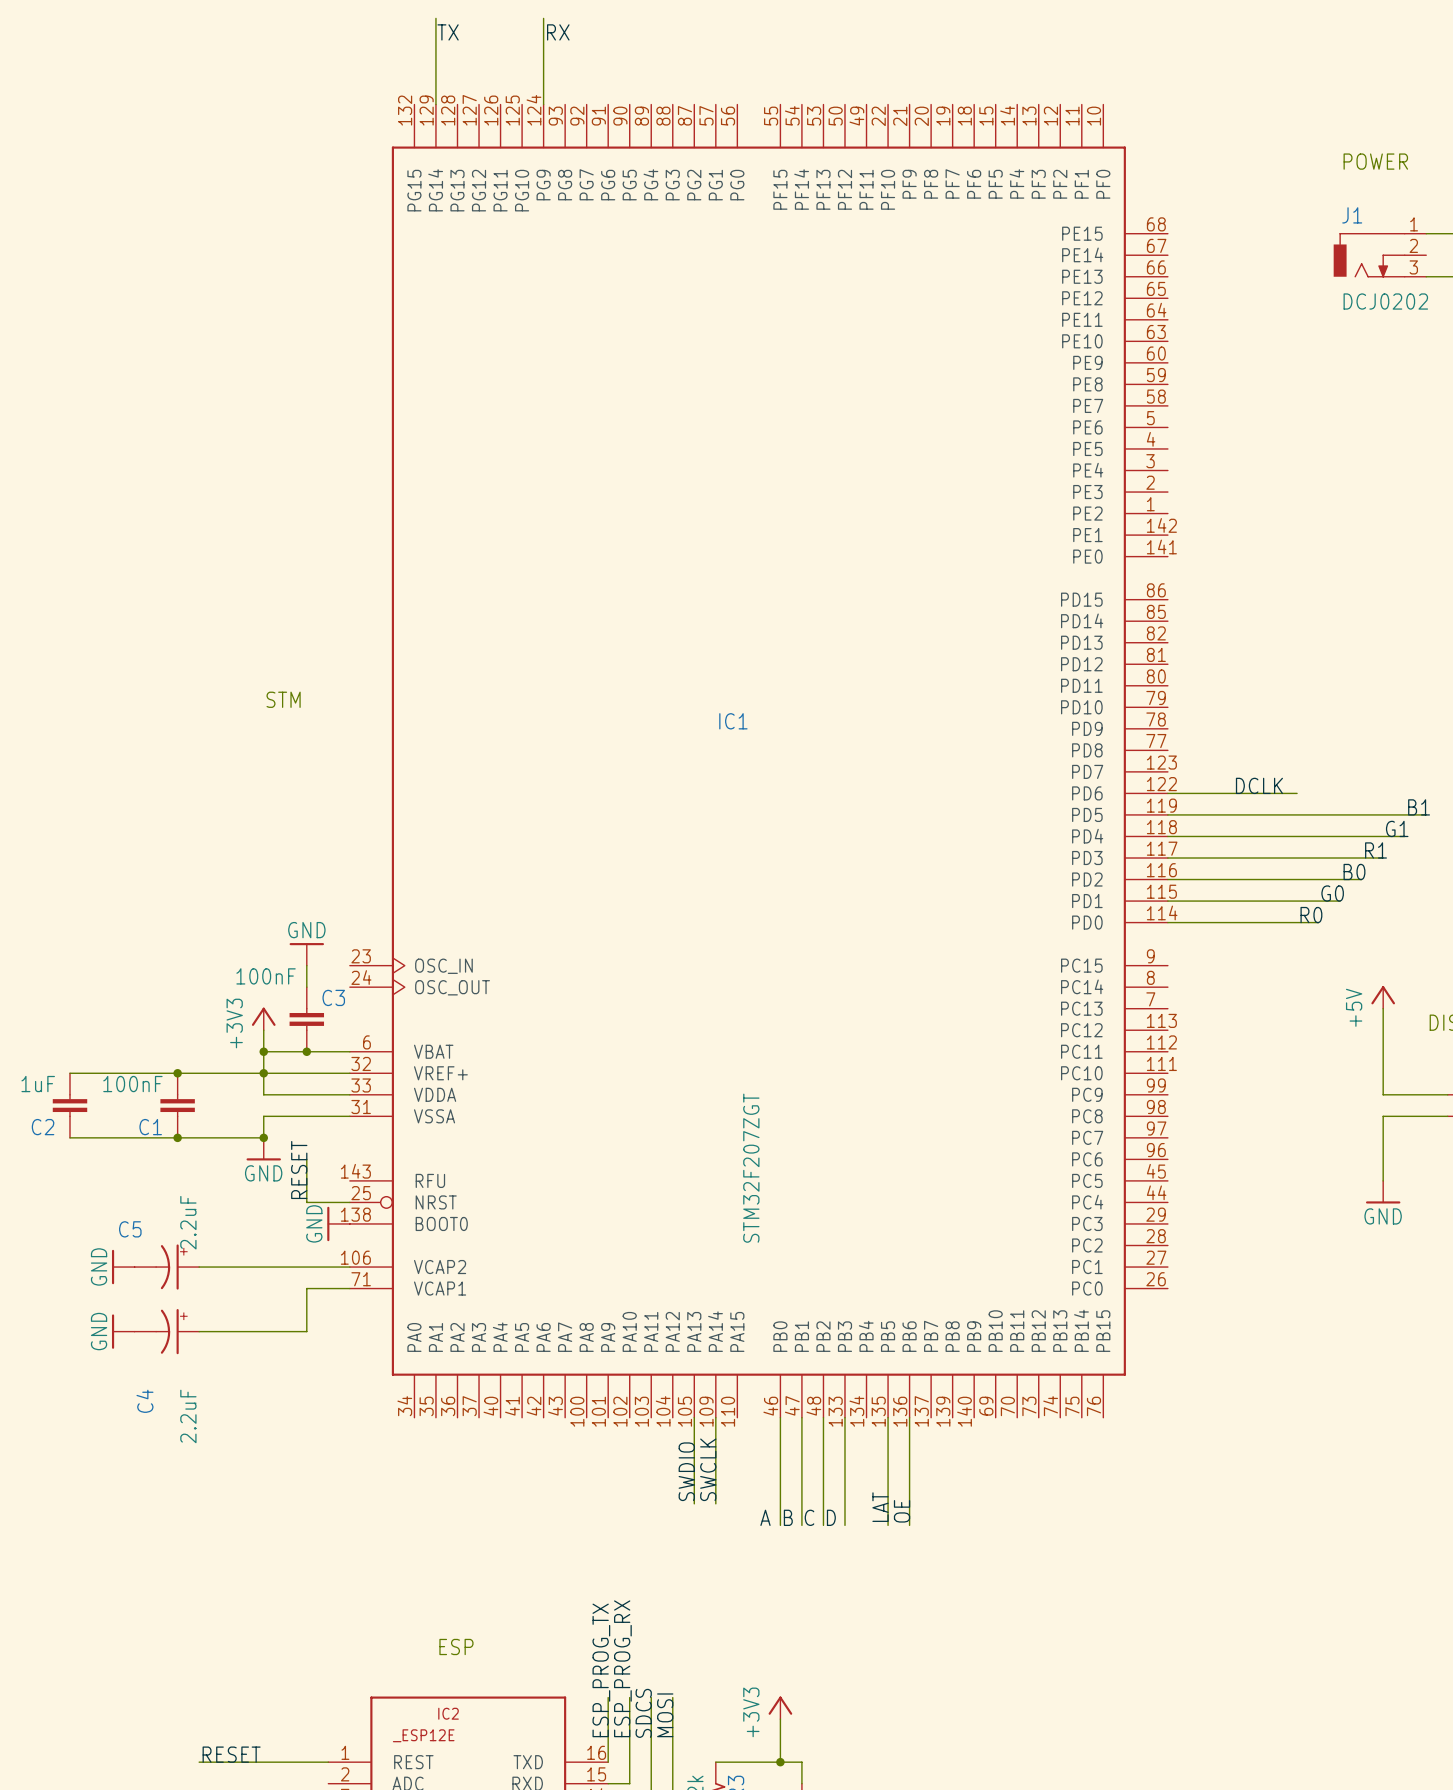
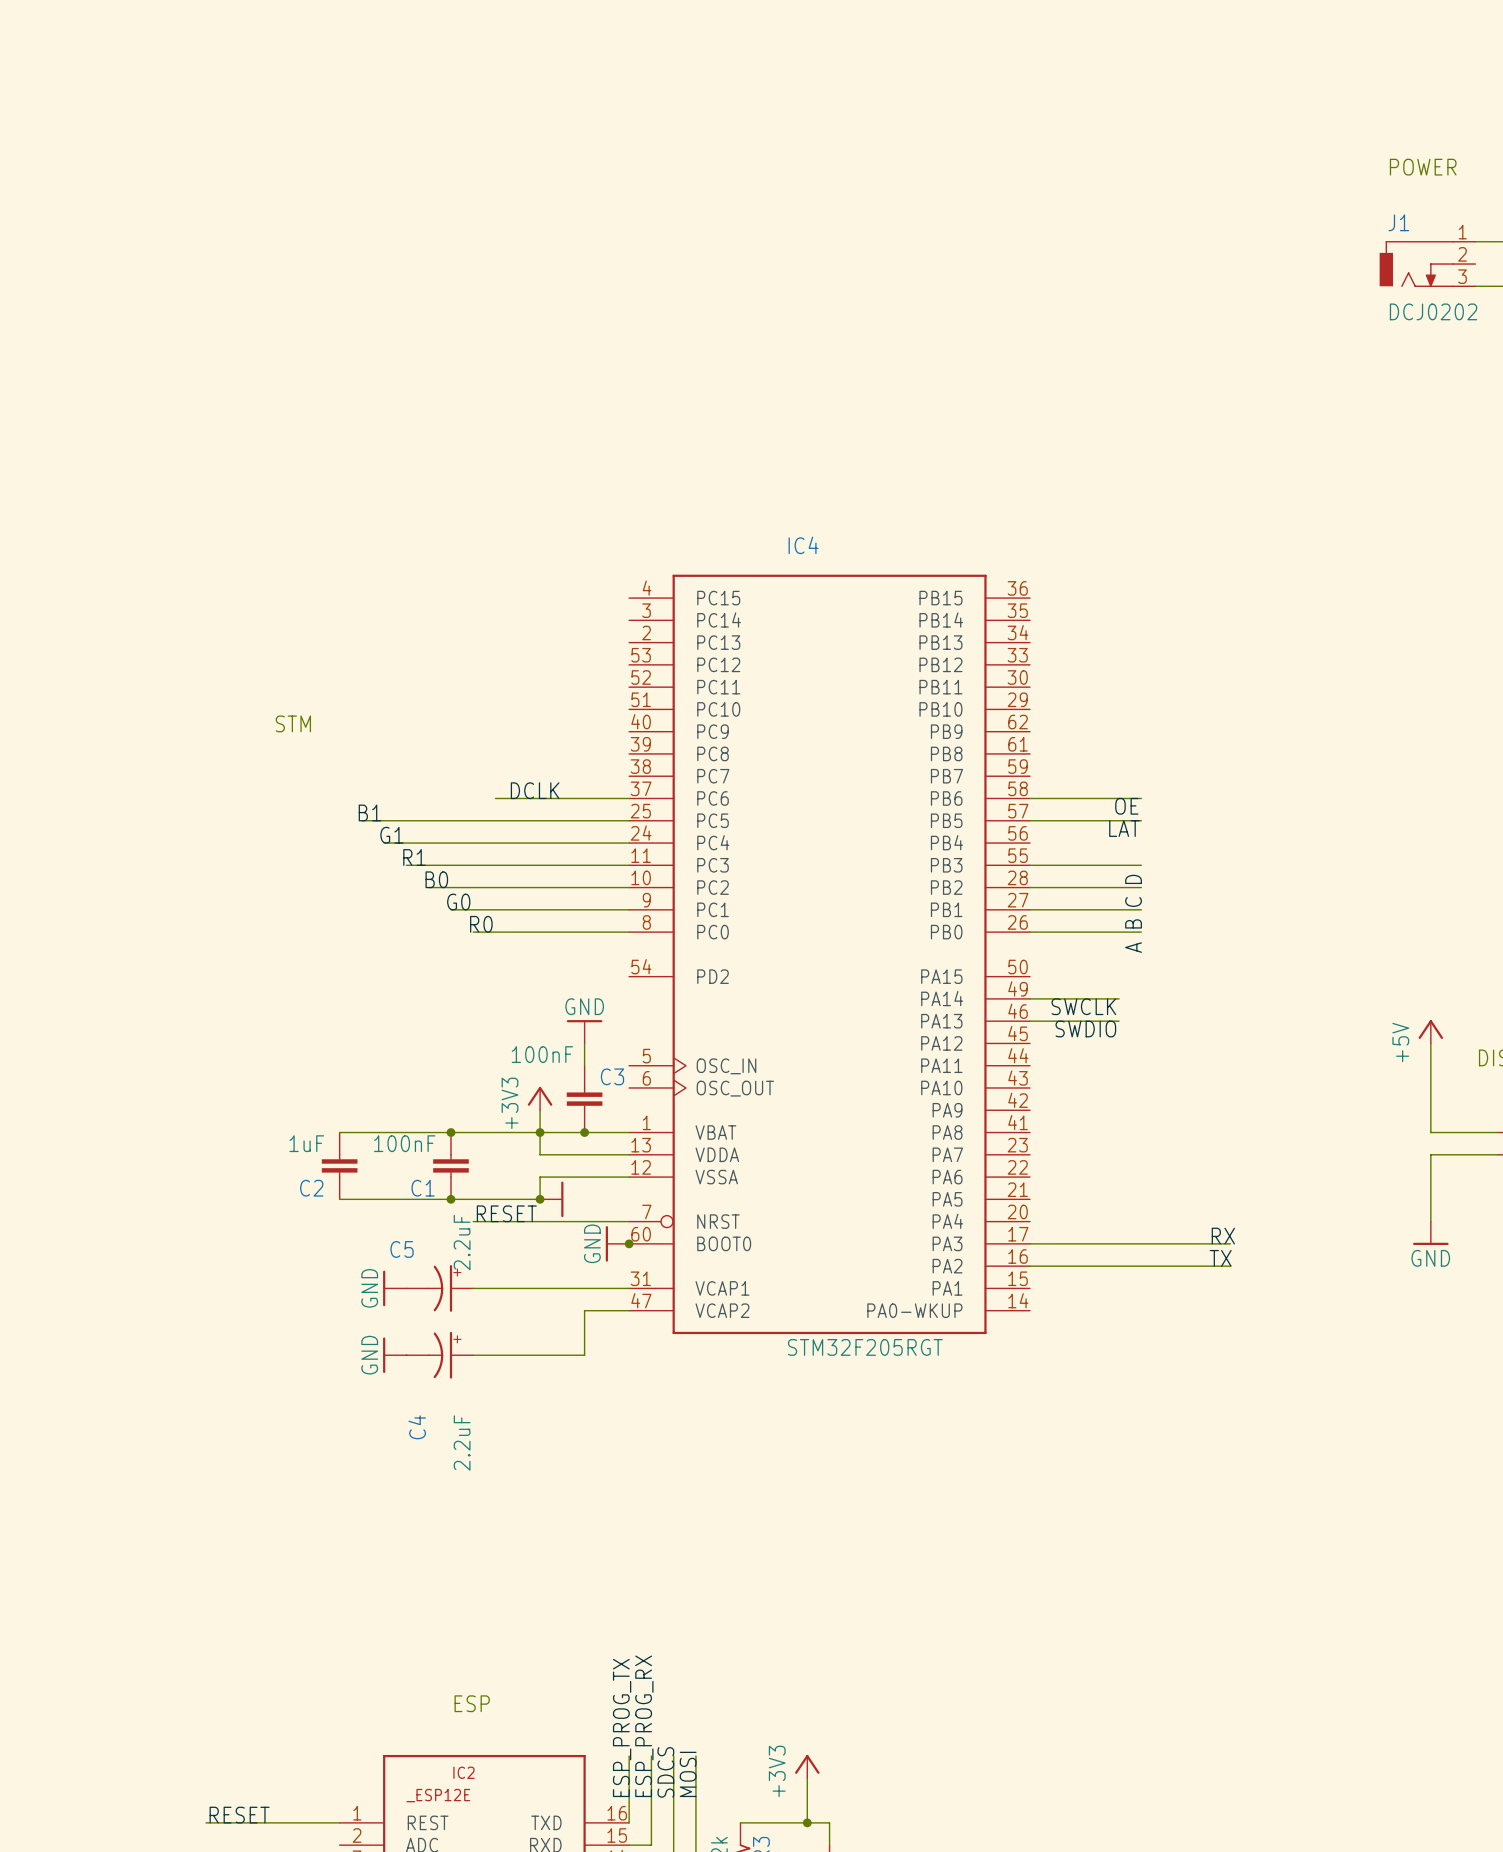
wire: (435, 18) (435, 104) -> none
wire: (543, 18) (543, 104) -> none
label: TX (448, 32) -> none
label: RX (558, 32) -> none
IC1: STM32F207ZGT (758, 761) -> none
label: none -> DCLK (535, 790)
wire: none -> (495, 798) (629, 798)
wire: none -> (1029, 798) (1141, 798)
label: none -> OE (1126, 806)
label: none -> B1 (370, 812)
label: DCLK (1259, 785) -> none
wire: none -> (361, 820) (629, 820)
wire: none -> (1029, 820) (1141, 820)
wire: (1167, 793) (1297, 793) -> none
label: none -> LAT (1124, 828)
label: none -> G1 (391, 835)
label: B1 (1419, 807) -> none
wire: none -> (384, 843) (629, 843)
wire: (1167, 814) (1426, 814) -> none
label: none -> R1 (414, 857)
label: G1 (1397, 828) -> none
wire: none -> (406, 865) (629, 865)
wire: none -> (1029, 865) (1141, 865)
wire: (1167, 836) (1404, 836) -> none
label: none -> B0 (436, 879)
label: none -> D (1133, 879)
label: R1 (1376, 850) -> none
wire: none -> (428, 887) (629, 887)
wire: none -> (1029, 887) (1141, 887)
wire: (1167, 858) (1383, 858) -> none
label: none -> G0 (458, 902)
label: none -> C (1133, 902)
label: B0 (1354, 871) -> none
wire: none -> (450, 909) (629, 909)
wire: none -> (1029, 909) (1141, 909)
wire: (1167, 879) (1361, 879) -> none
label: none -> R0 (481, 924)
label: none -> B (1133, 923)
label: G0 (1332, 893) -> none
wire: none -> (473, 932) (629, 932)
wire: none -> (1029, 932) (1141, 932)
wire: (1167, 901) (1340, 901) -> none
label: none -> A (1133, 947)
label: R0 (1311, 915) -> none
IC4: none -> STM32F205RGT (829, 954)
wire: (1167, 922) (1318, 922) -> none
power symbol: GND (306, 954) -> none
wire: (306, 965) (306, 987) -> none
wire: none -> (1029, 998) (1119, 998)
label: none -> SWCLK (1083, 1006)
wire: none -> (1029, 1021) (1119, 1021)
label: none -> SWDIO (1085, 1028)
power symbol: none -> GND (584, 1031)
wire: none -> (584, 1043) (584, 1065)
power symbol: +3V3 (263, 1018) -> none
C3 position: (306, 1019) -> (584, 1099)
wire: (263, 1030) (263, 1094) (328, 1094) -> none
wire: (263, 1051) (349, 1051) -> none
junction: (263, 1051) -> none
junction: (306, 1051) -> none
power symbol: none -> +3V3 (540, 1098)
wire: (69, 1073) (349, 1073) -> none
junction: (177, 1073) -> none
junction: (263, 1073) -> none
wire: none -> (540, 1110) (540, 1154) (629, 1154)
wire: none -> (361, 1132) (629, 1132)
junction: none -> (450, 1132)
junction: none -> (540, 1132)
junction: none -> (584, 1132)
C2 position: (69, 1105) -> (339, 1165)
C1 position: (177, 1105) -> (450, 1165)
wire: (349, 1116) (263, 1116) (263, 1137) (69, 1137) -> none
junction: (177, 1137) -> none
junction: (263, 1137) -> none
wire: none -> (629, 1177) (540, 1177) (540, 1199) (339, 1199)
power symbol: GND (263, 1149) -> none
wire: (306, 1159) (306, 1202) (349, 1202) -> none
junction: none -> (450, 1199)
junction: none -> (540, 1199)
power symbol: none -> (551, 1199)
label rotation: 0° (299, 1170) -> 90° clockwise (506, 1213)
label position: RESET (299, 1170) -> RESET (506, 1213)
wire: none -> (473, 1221) (629, 1221)
label: none -> RX (1223, 1236)
power symbol: none -> GND (617, 1243)
junction: none -> (629, 1243)
wire: none -> (1029, 1243) (1230, 1243)
label: none -> TX (1220, 1258)
power symbol: GND (338, 1223) -> none
wire: none -> (1029, 1266) (1230, 1266)
power symbol: none -> GND (394, 1288)
wire: none -> (473, 1288) (629, 1288)
power symbol: GND (123, 1267) -> none
C5 position: (166, 1267) -> (439, 1288)
wire: (199, 1267) (349, 1267) -> none
wire: none -> (629, 1310) (584, 1310) (584, 1355) (473, 1355)
wire: (349, 1288) (306, 1288) (306, 1331) (199, 1331) -> none
power symbol: none -> GND (394, 1355)
power symbol: GND (123, 1331) -> none
C4 position: (166, 1331) -> (439, 1355)
wire: (694, 1417) (694, 1503) -> none
wire: (715, 1417) (715, 1503) -> none
wire: (780, 1417) (780, 1525) -> none
wire: (801, 1417) (801, 1525) -> none
wire: (823, 1417) (823, 1525) -> none
wire: (844, 1417) (844, 1525) -> none
wire: (888, 1417) (888, 1525) -> none
wire: (909, 1417) (909, 1525) -> none
label: SWCLK (708, 1469) -> none
label: SWDIO (686, 1471) -> none
label: LAT (880, 1507) -> none
label: OE (902, 1511) -> none
label: A (765, 1517) -> none
label: B (788, 1517) -> none
label: C (809, 1517) -> none
label: D (831, 1517) -> none

